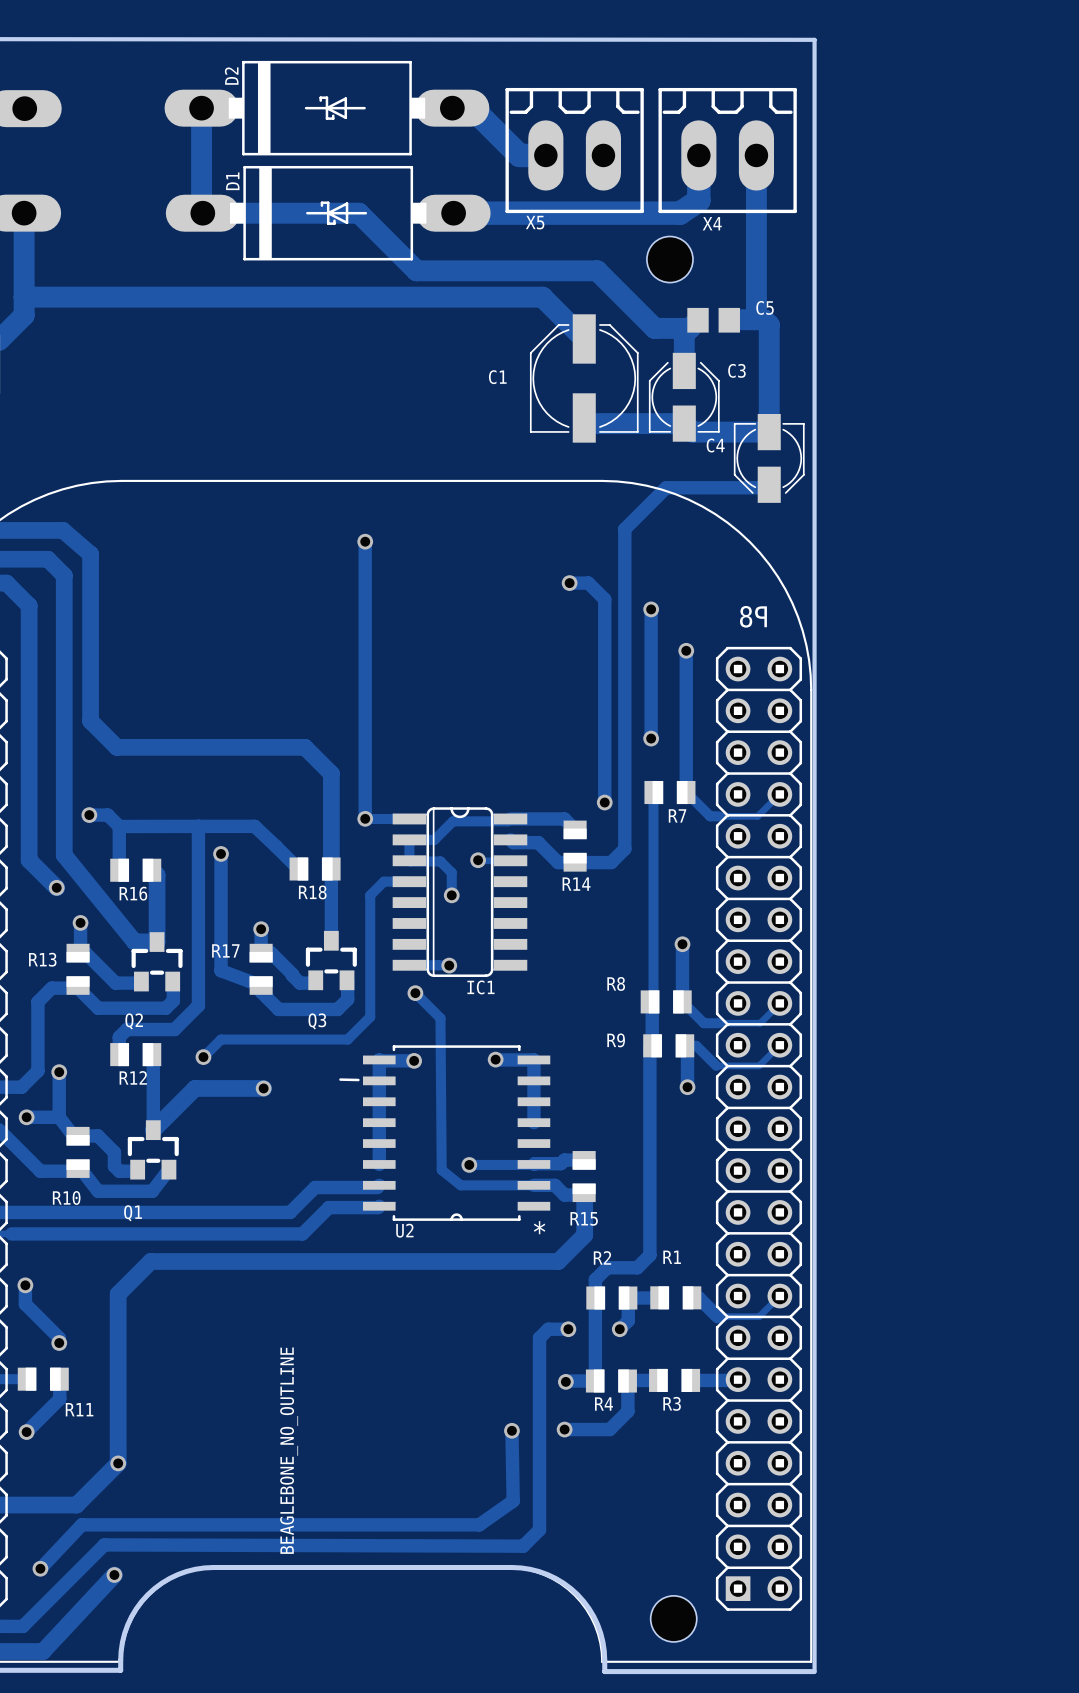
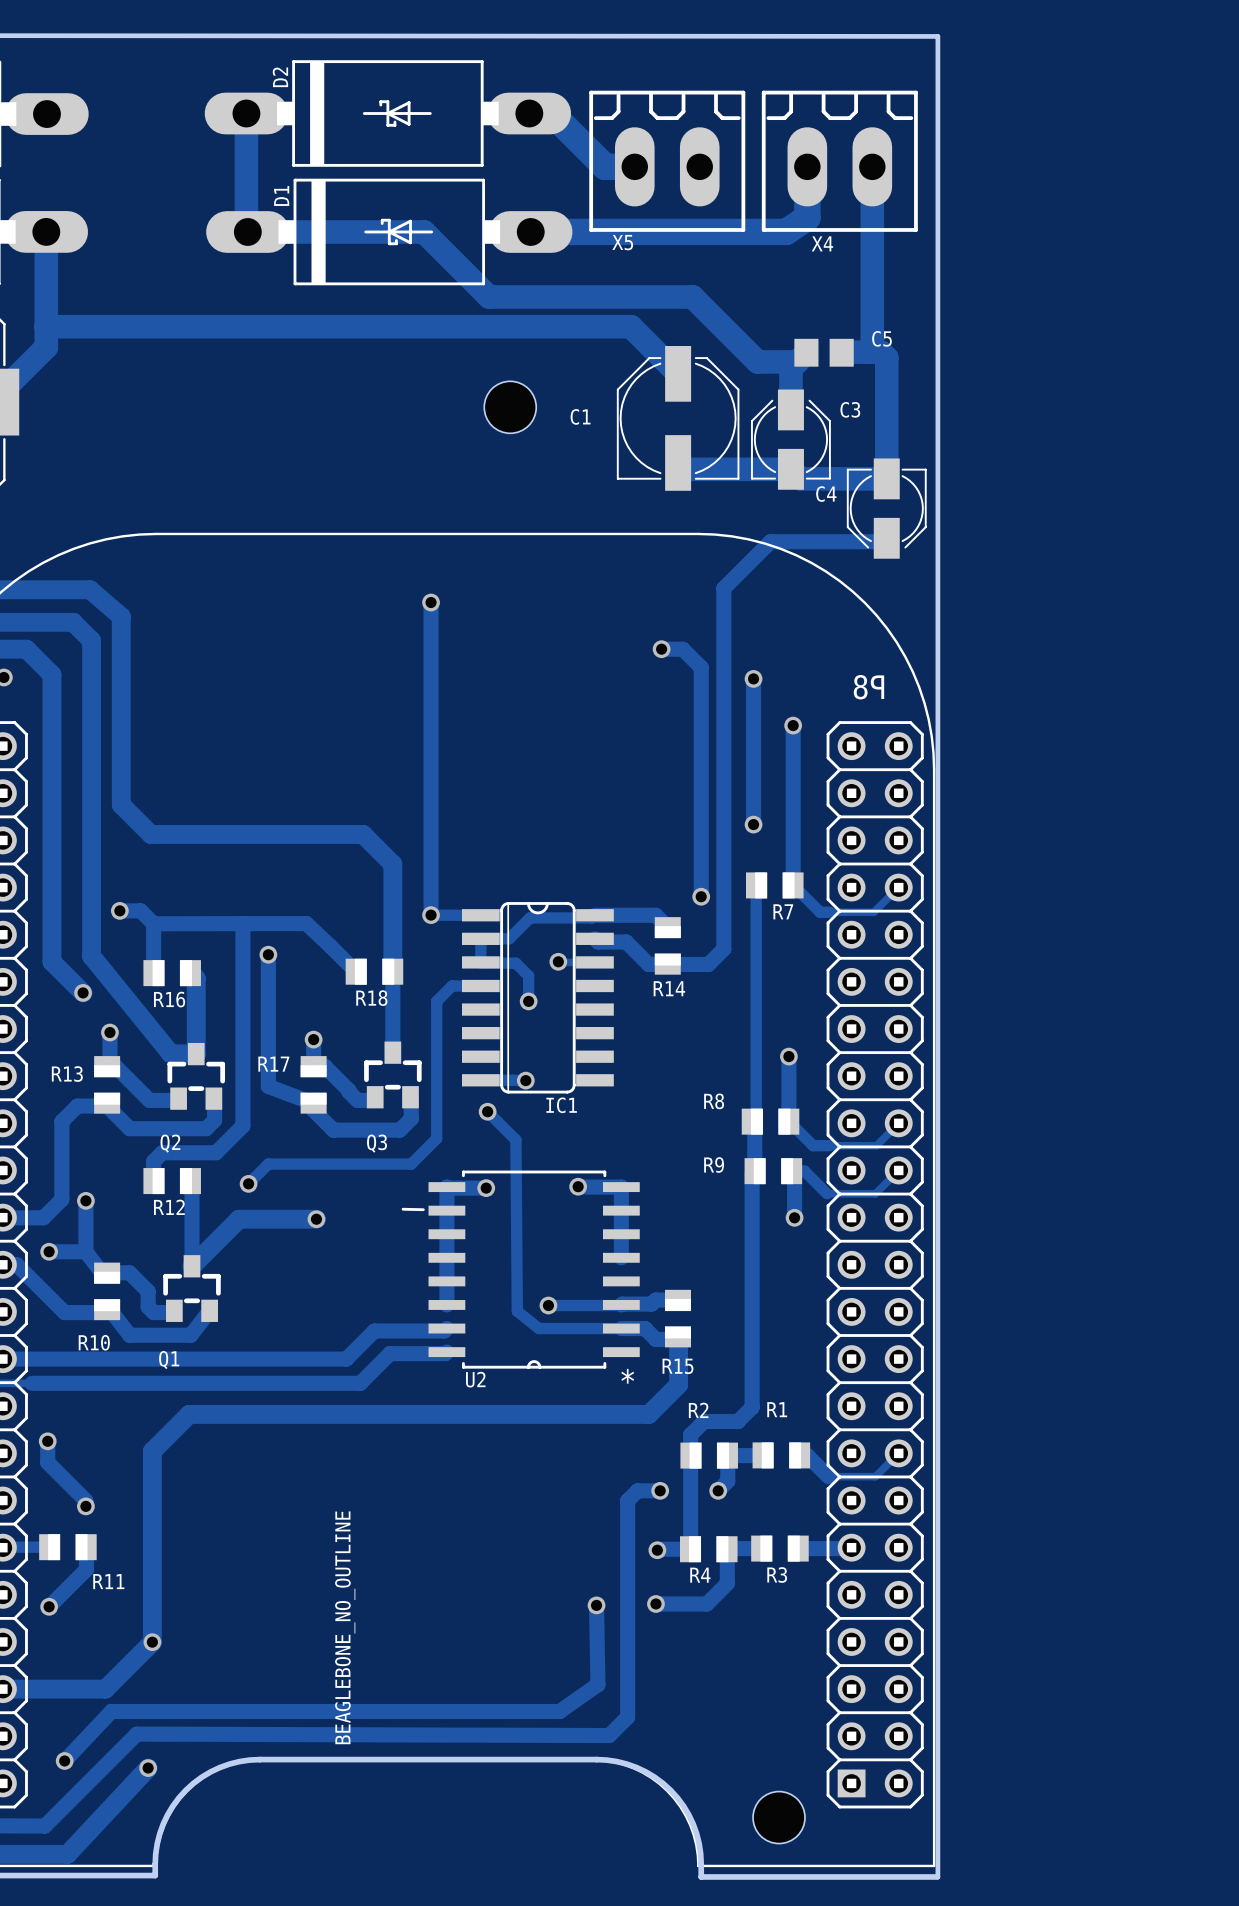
hole position: (669, 259) -> (510, 407)

